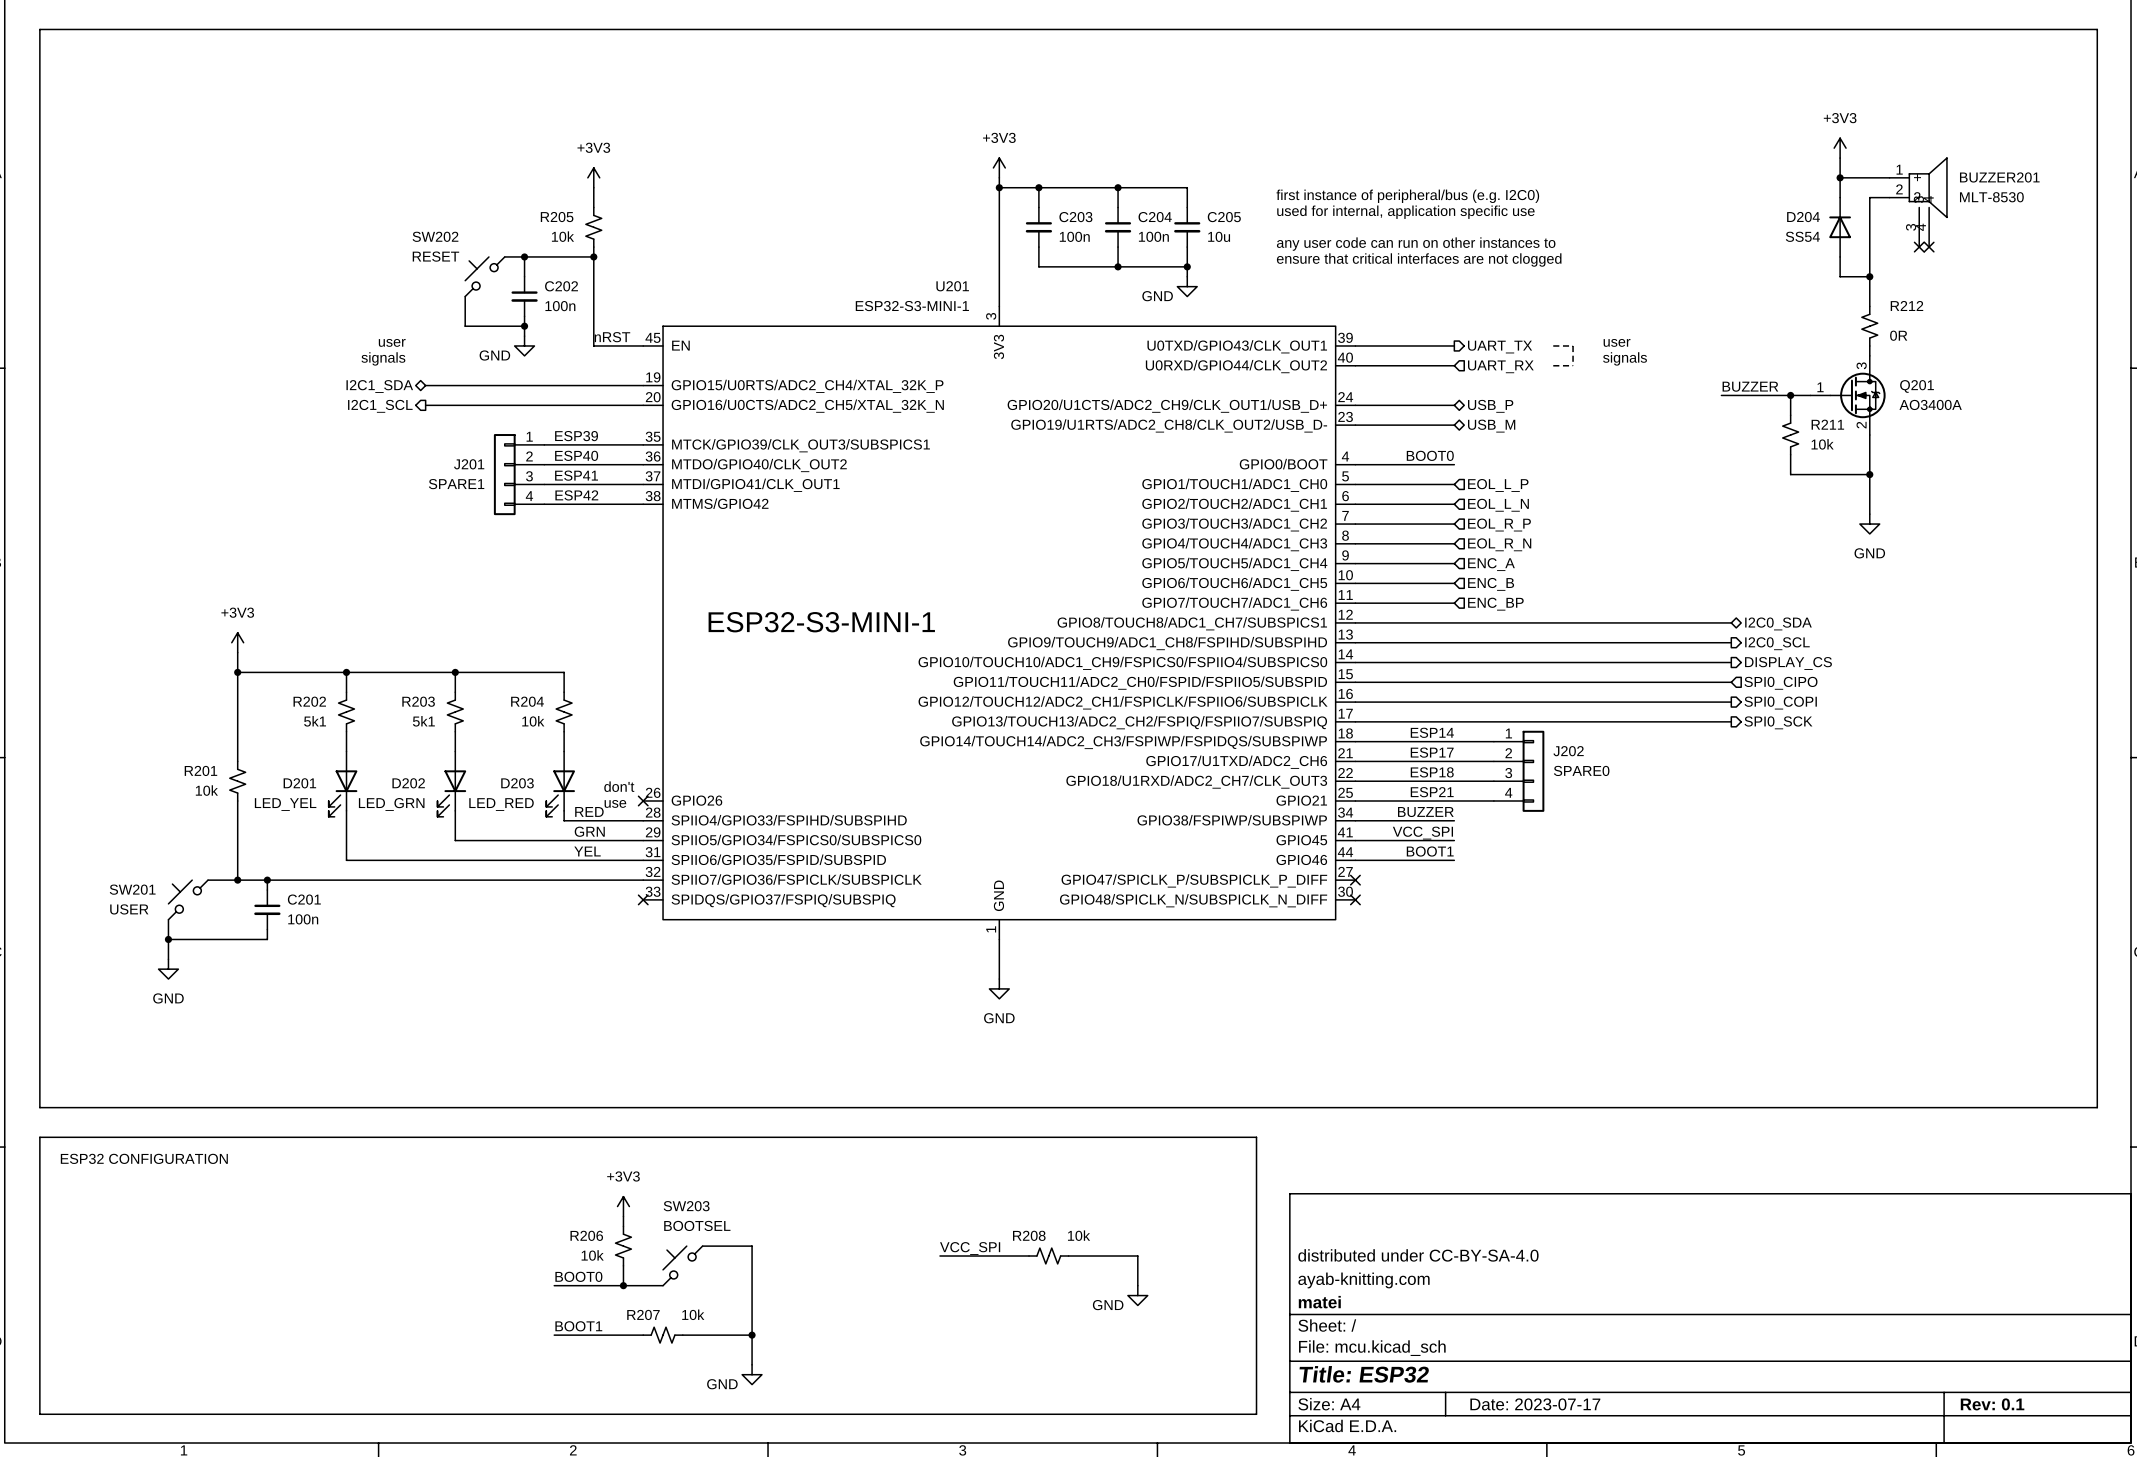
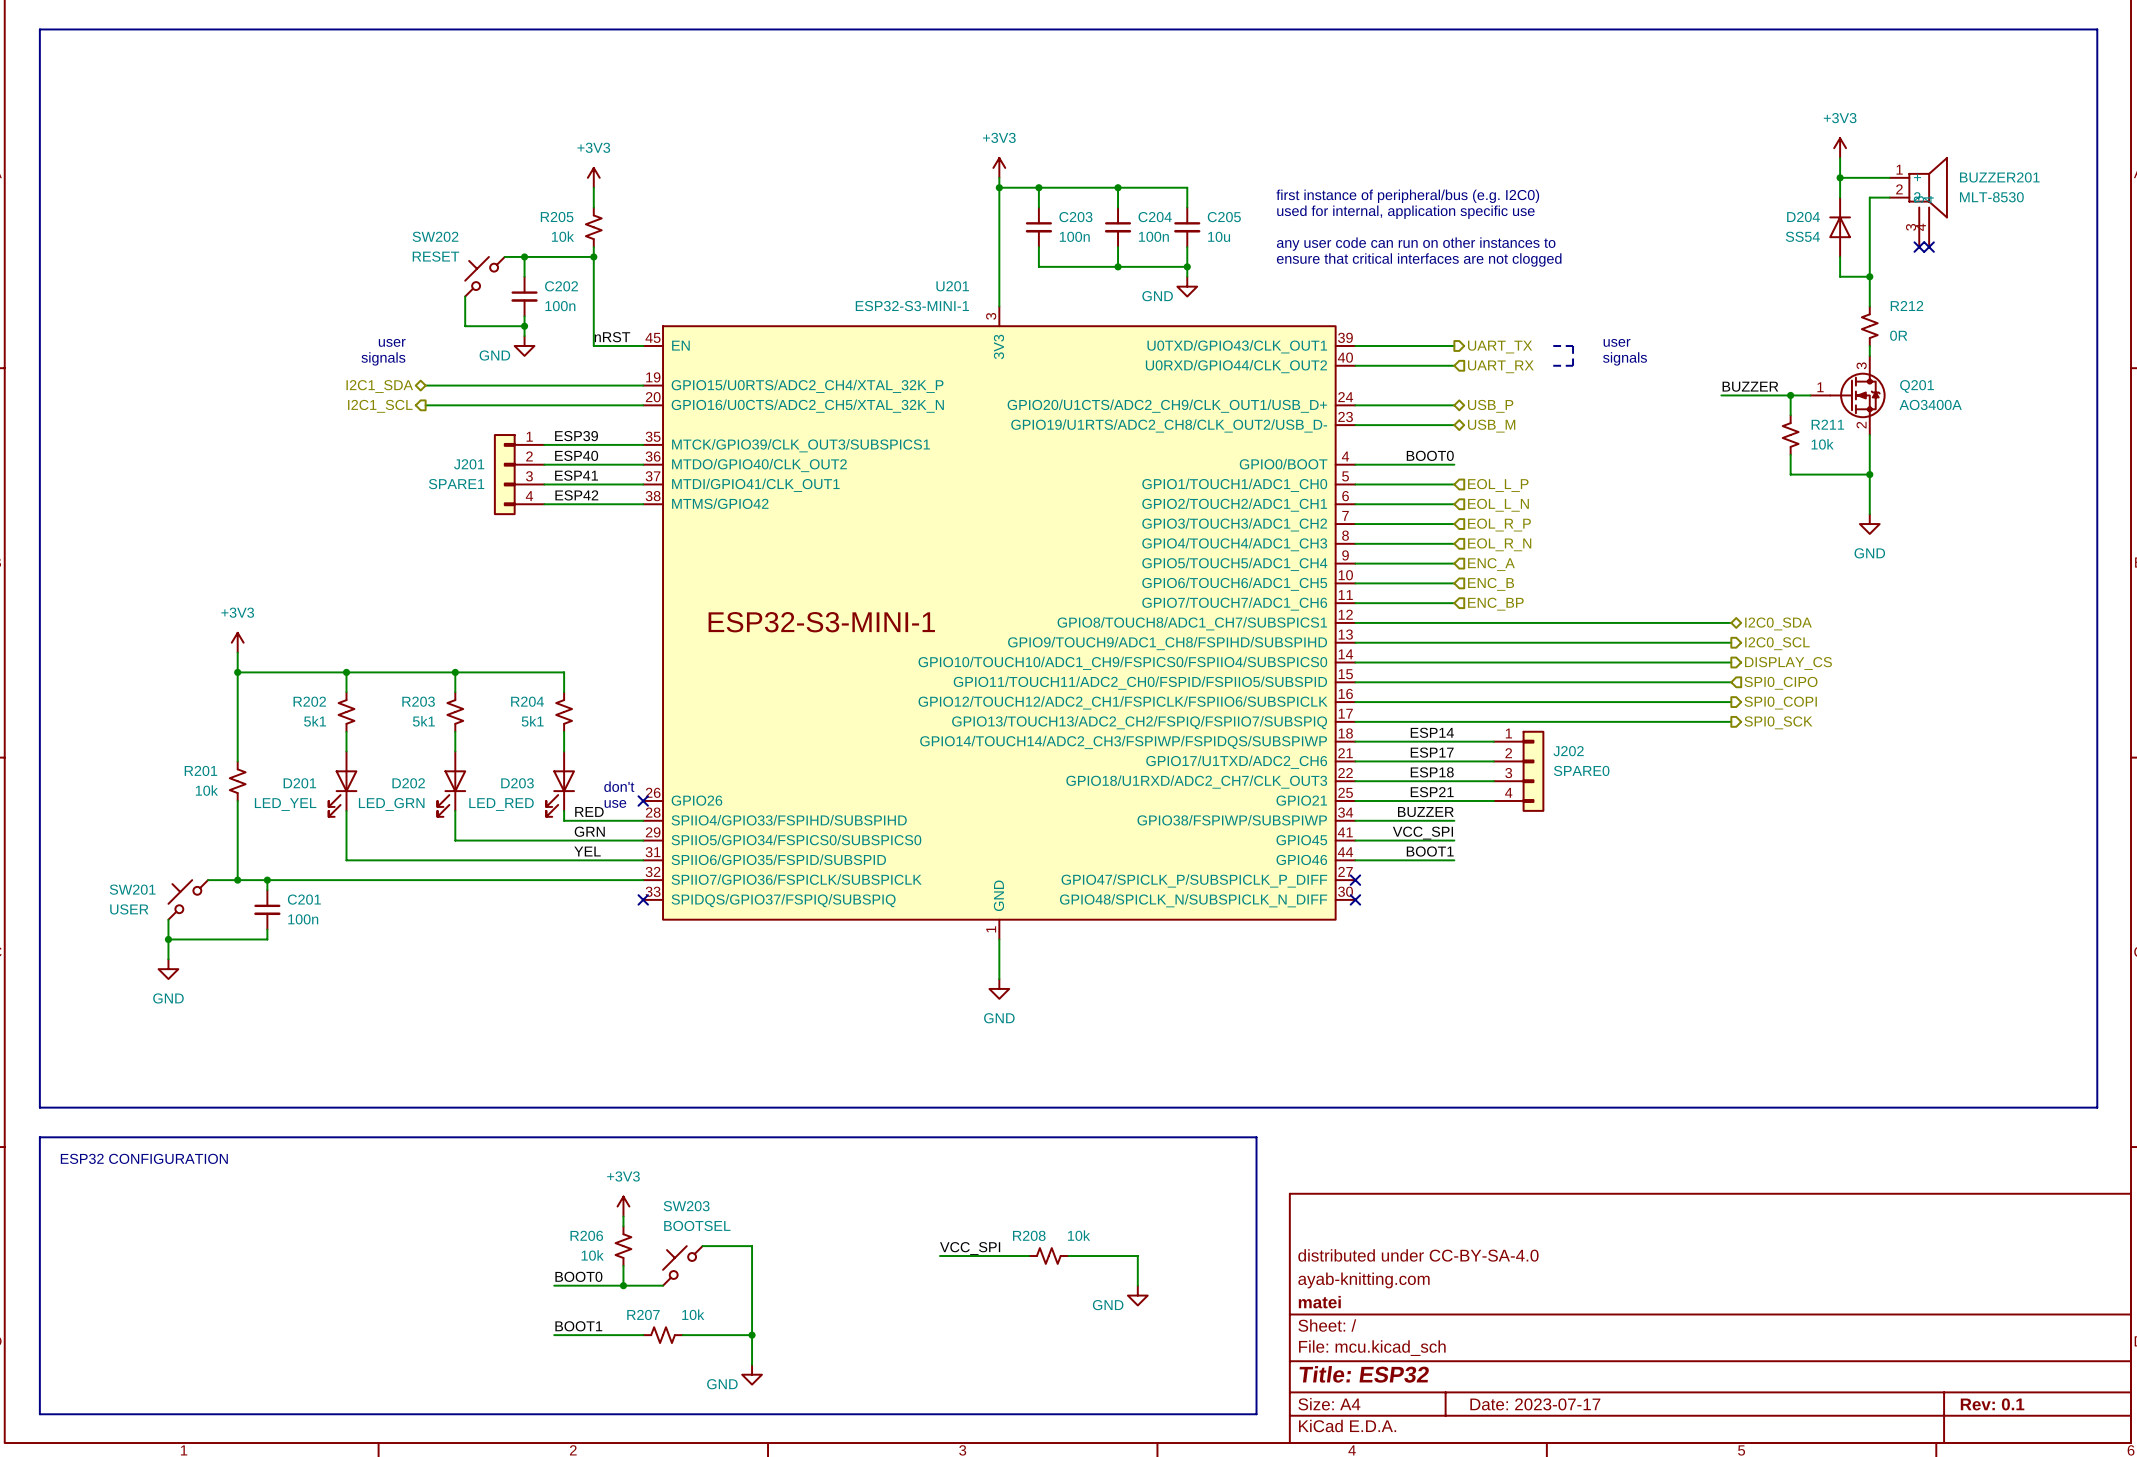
R204 flip: as is (564, 711) -> left-right (564, 711)
R204 value: 10k (533, 721) -> 5k1 (532, 721)

